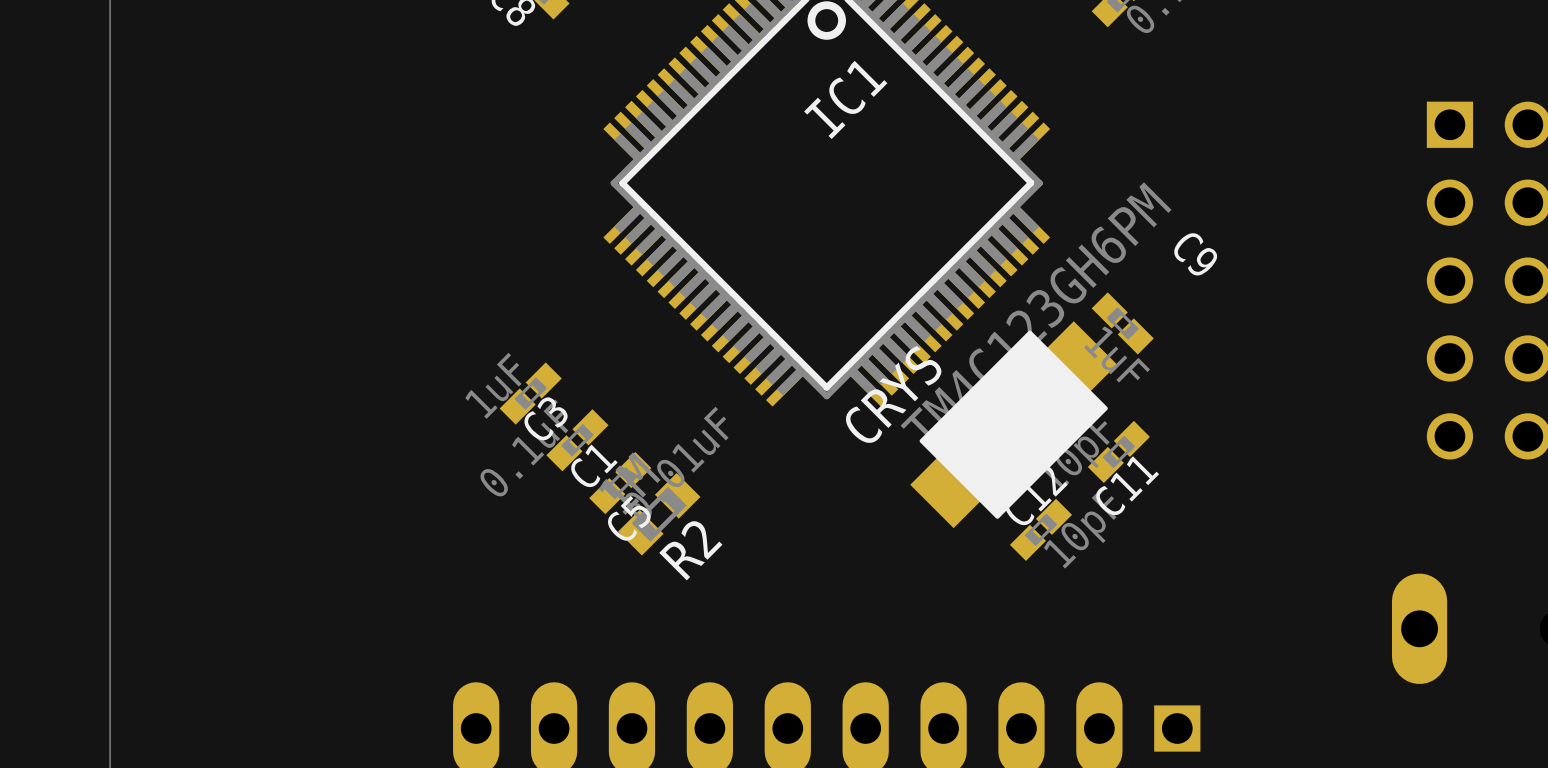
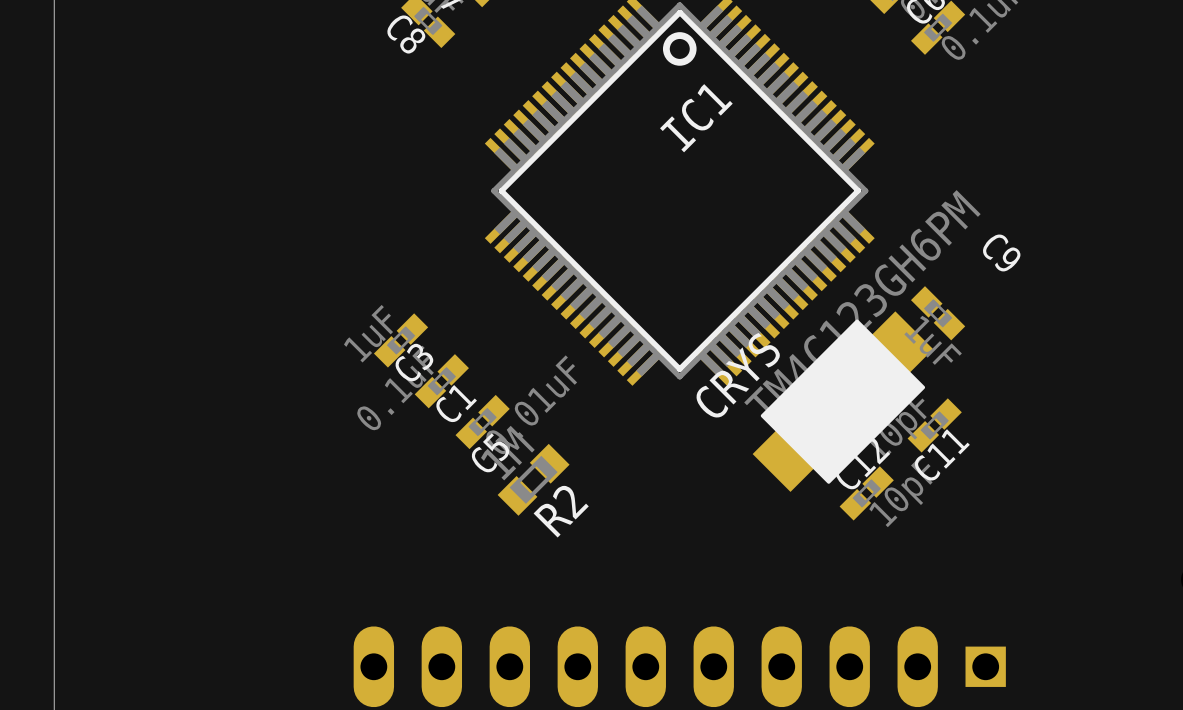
C3 position: (530, 393) -> (401, 340)
C1 position: (577, 440) -> (441, 381)
C5 position: (620, 483) -> (482, 422)

